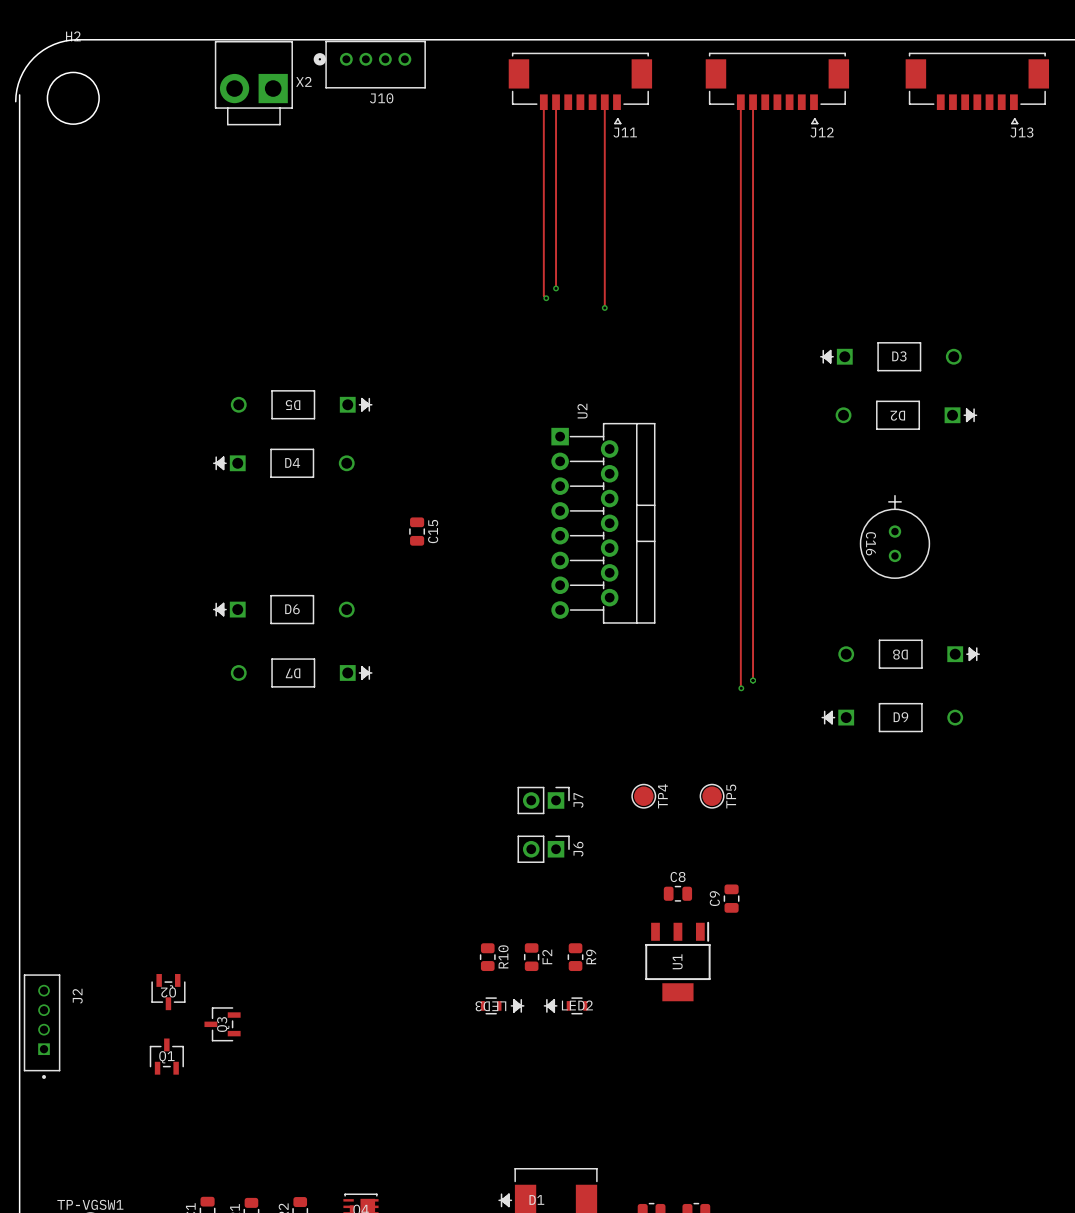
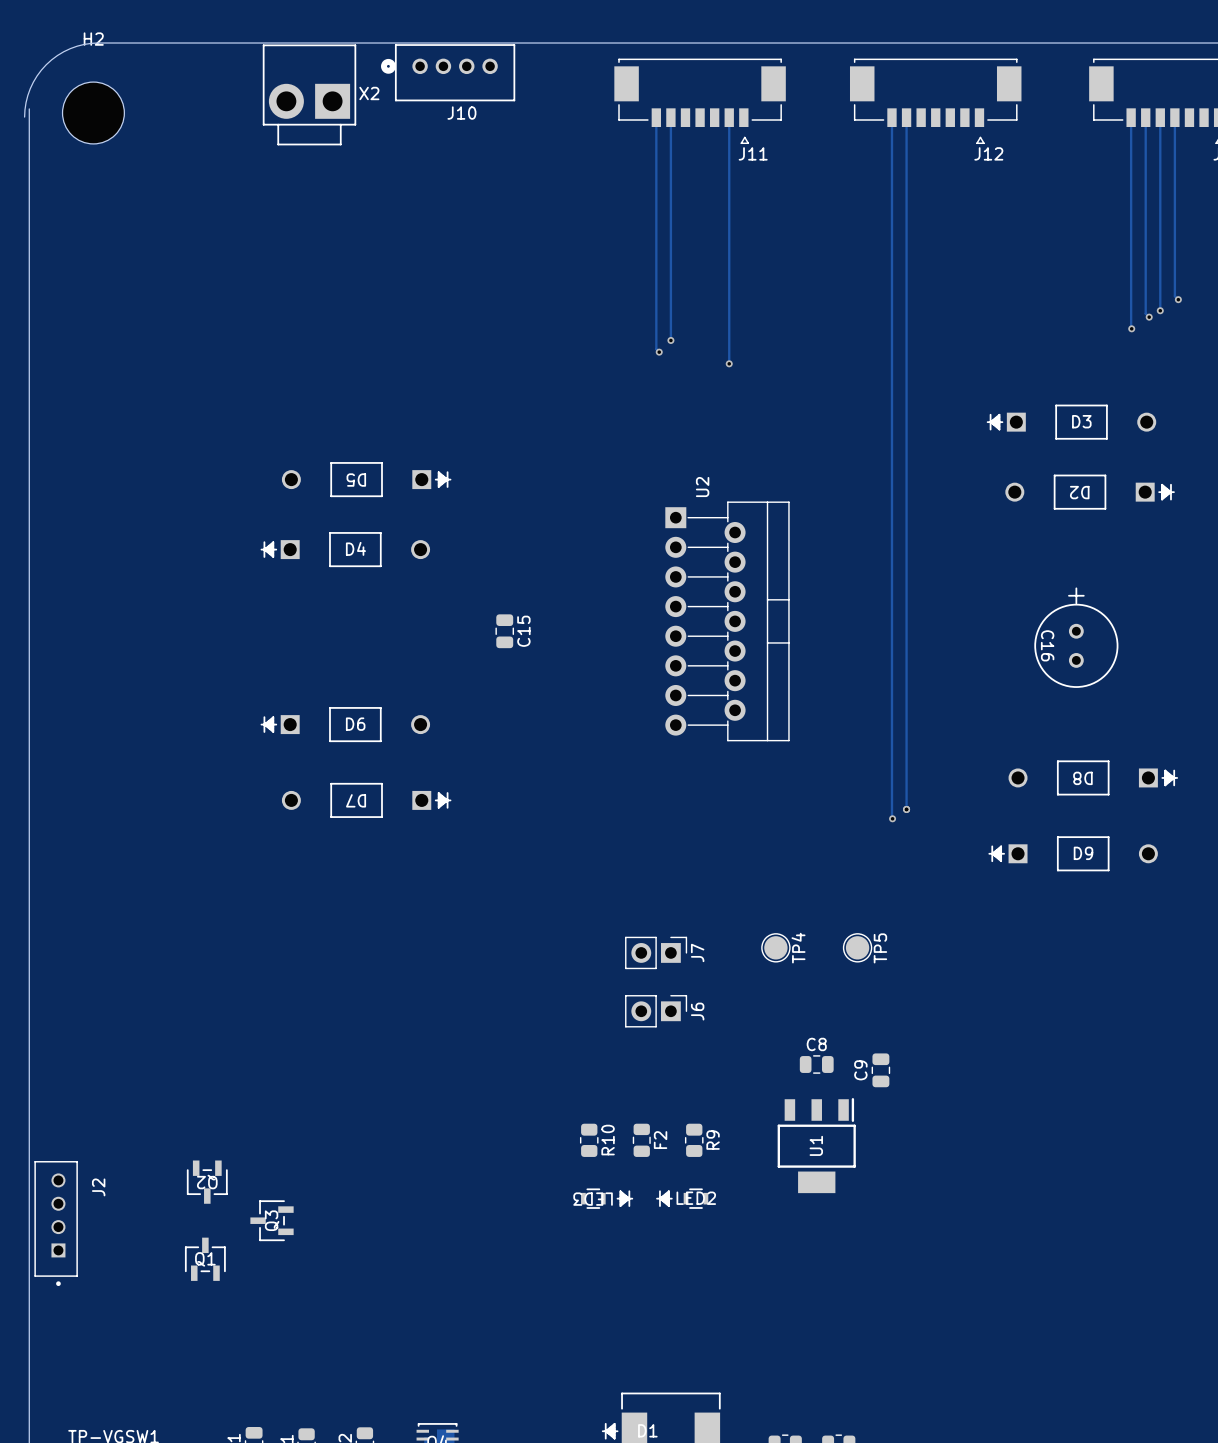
track: none -> (1145, 117) (1145, 313) (1149, 317)
track: none -> (1160, 117) (1160, 311)
track: none -> (1174, 117) (1174, 296) (1178, 299)
track: none -> (1132, 118) (1131, 117) (1131, 328)
via: none -> (1178, 299)
via: none -> (1160, 310)
via: none -> (1149, 317)
via: none -> (1131, 328)

